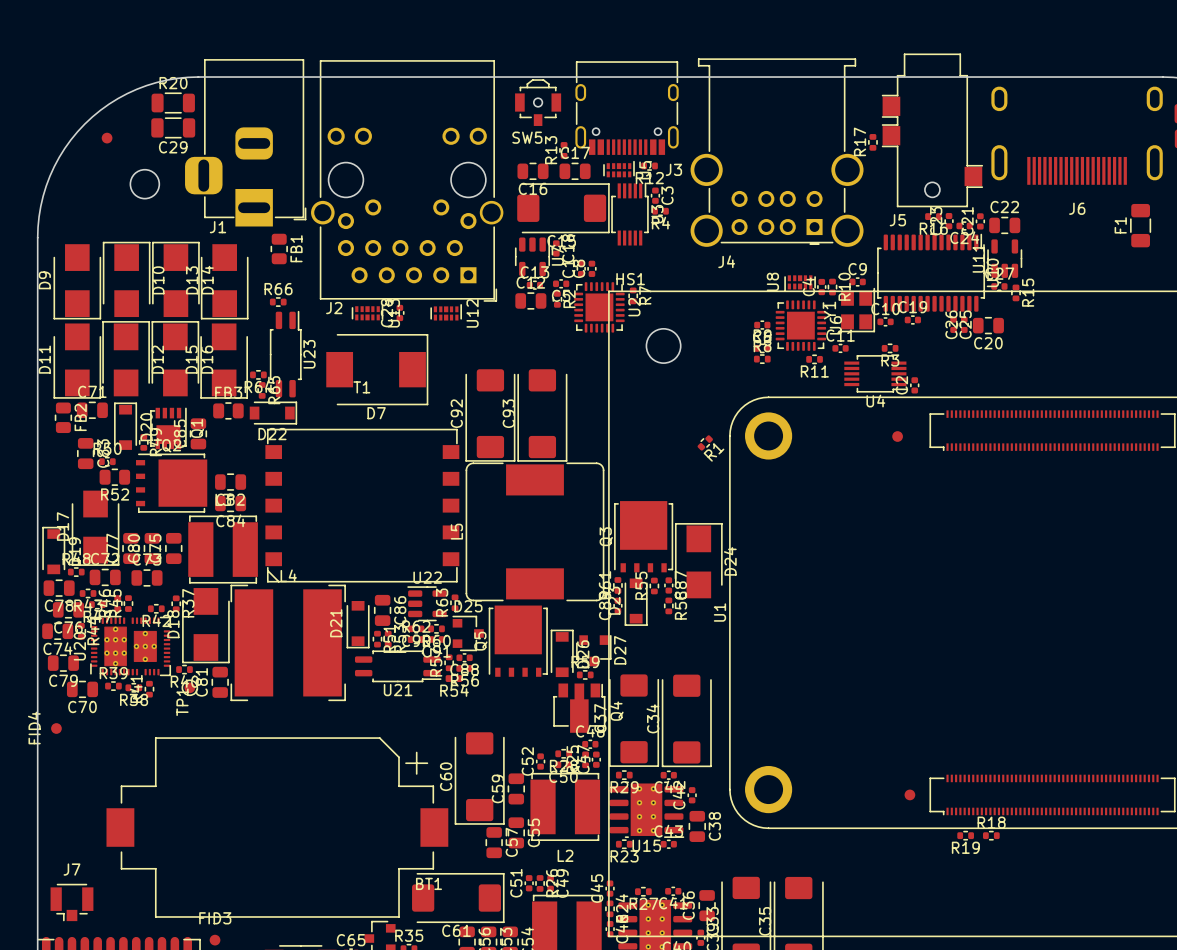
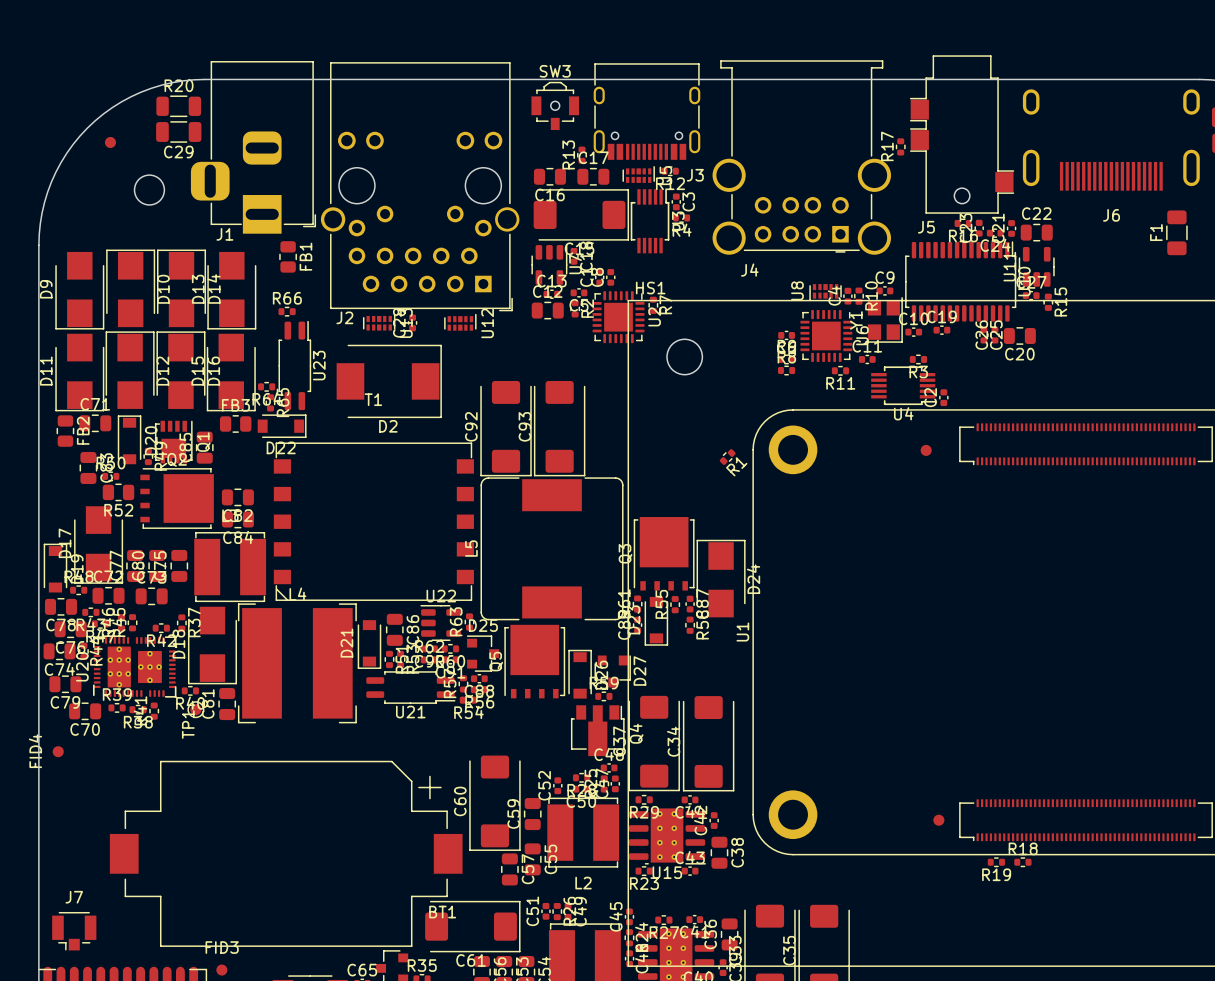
SW5 name: SW5 (527, 137) -> SW3 (555, 71)
D7 name: D7 (376, 413) -> D2 (388, 426)

